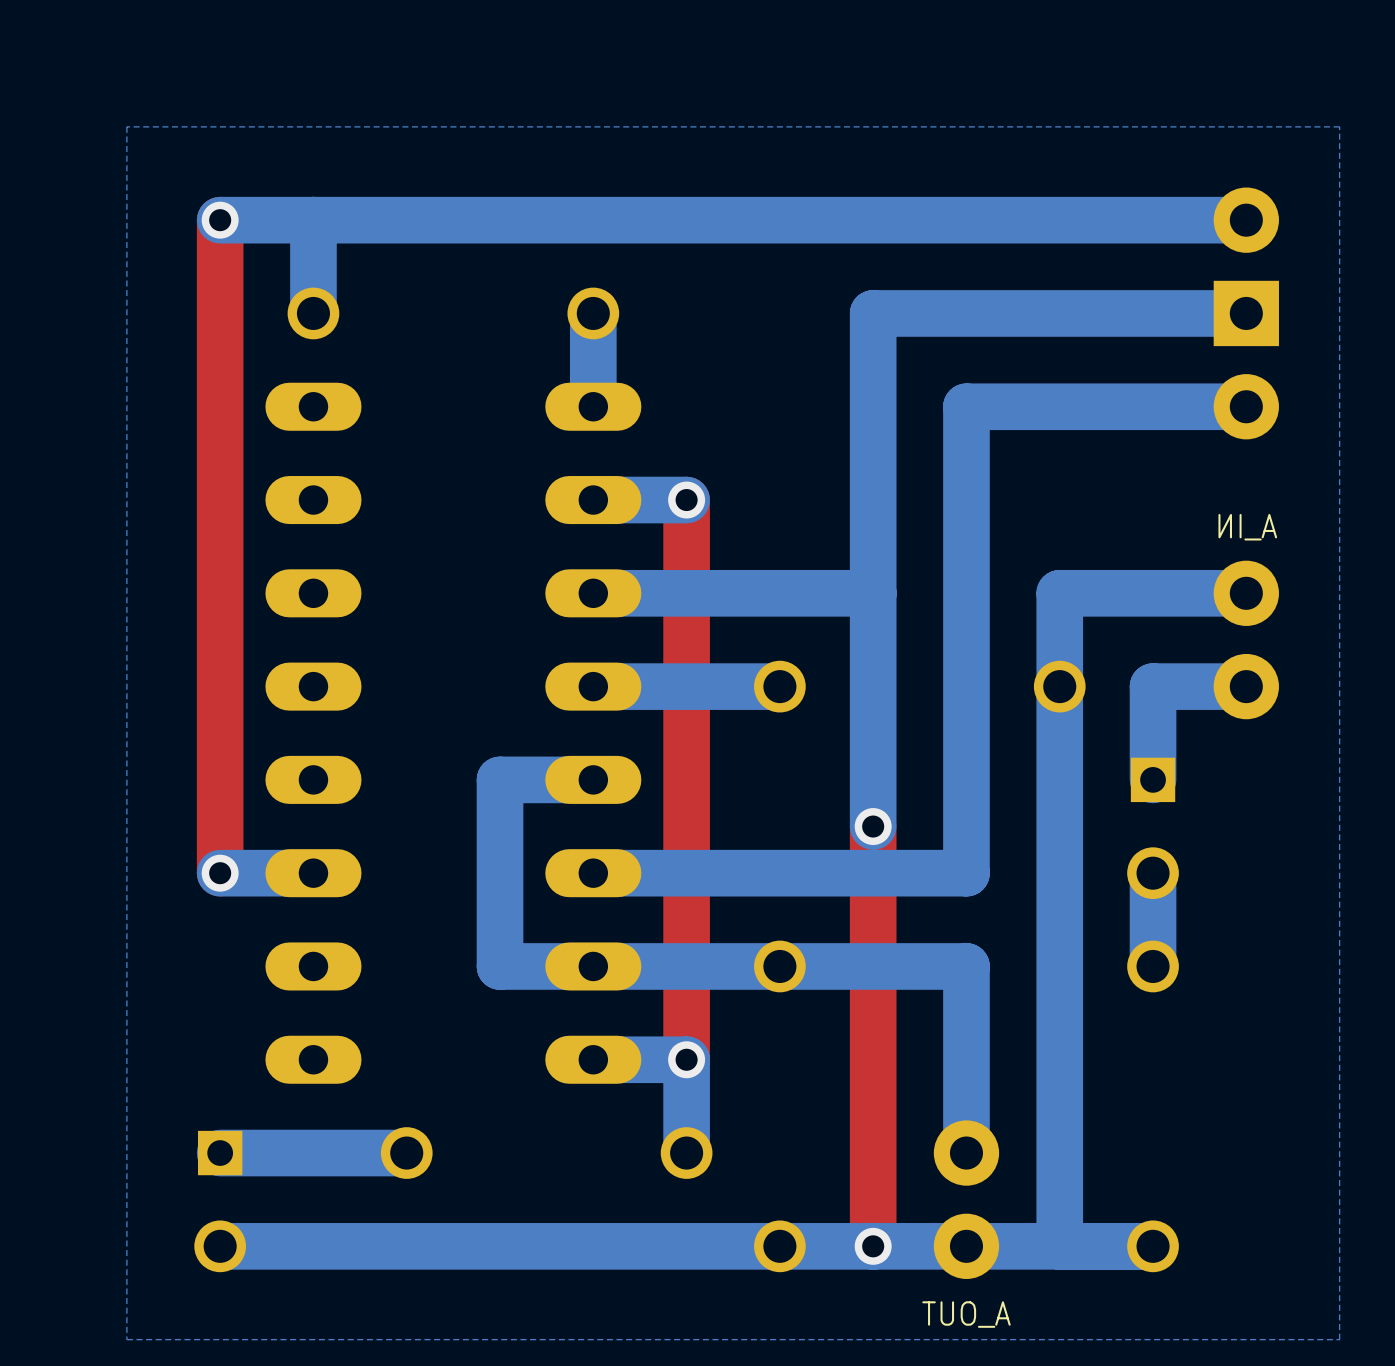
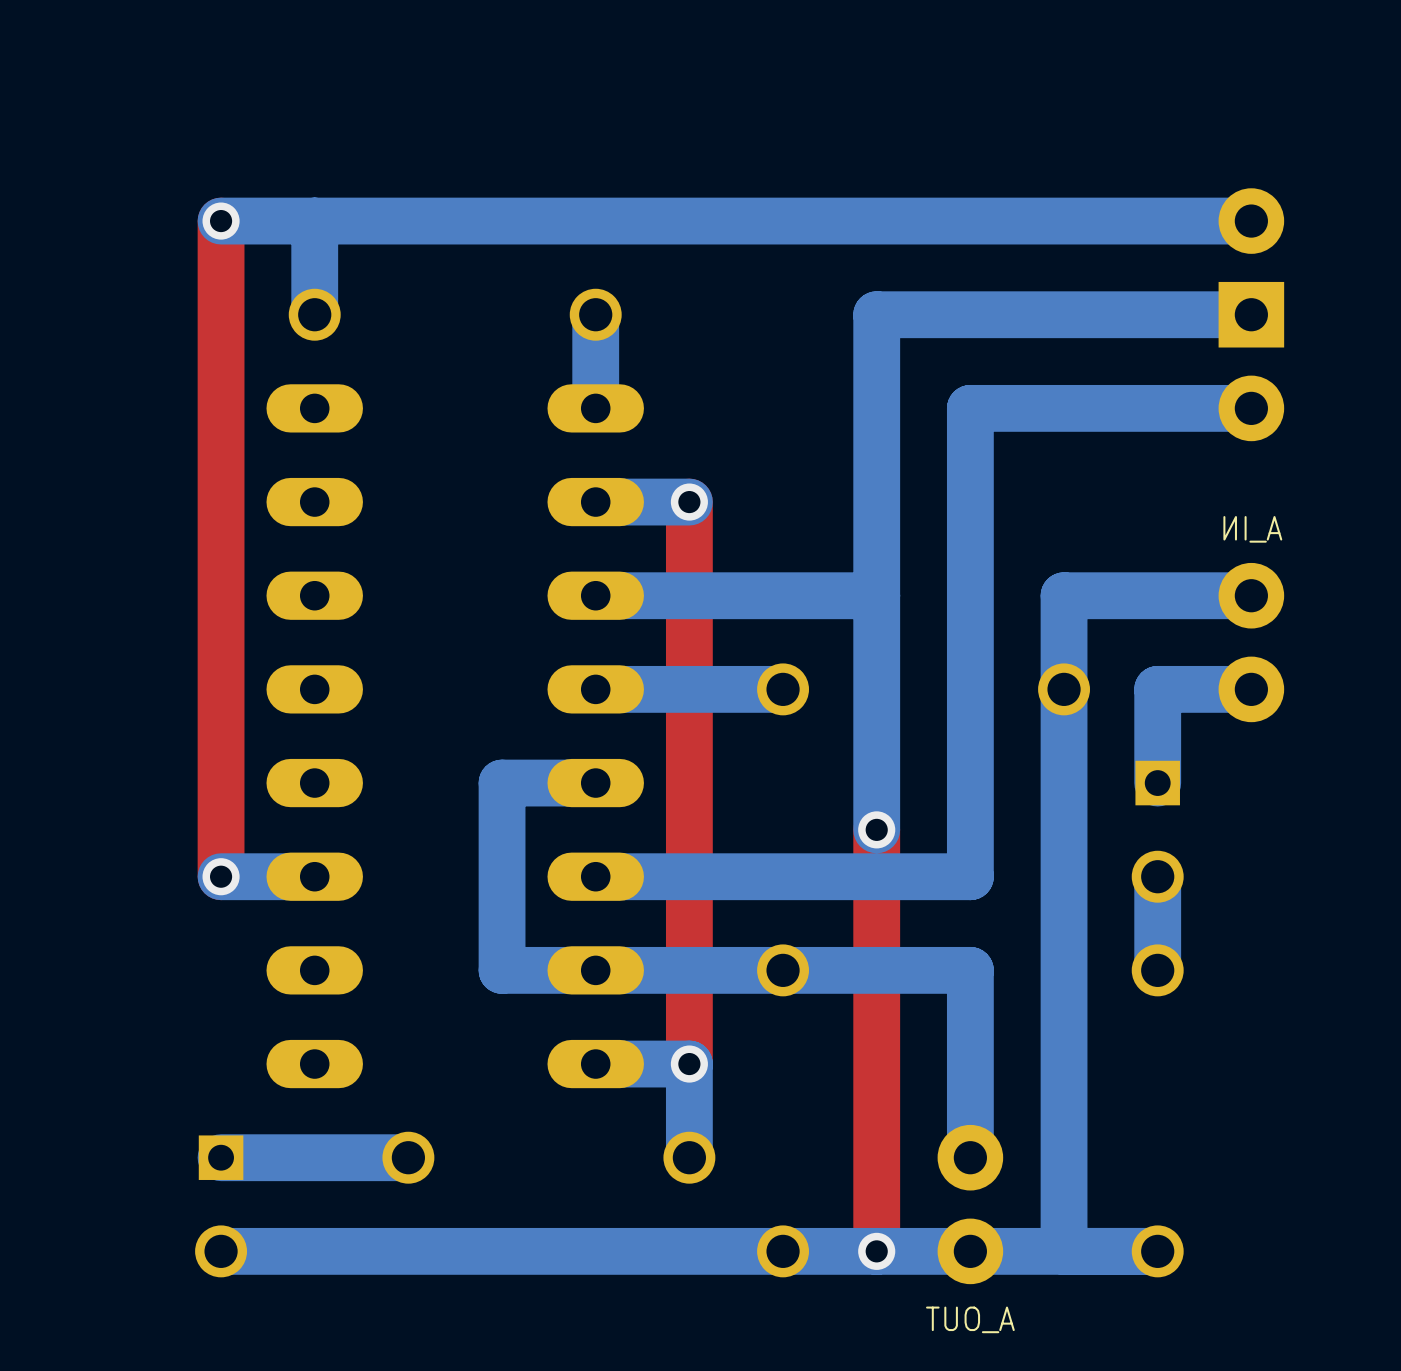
bottom zone outline: (1339, 126) (126, 126) (126, 1339) (1339, 1339) (1339, 126) -> none

